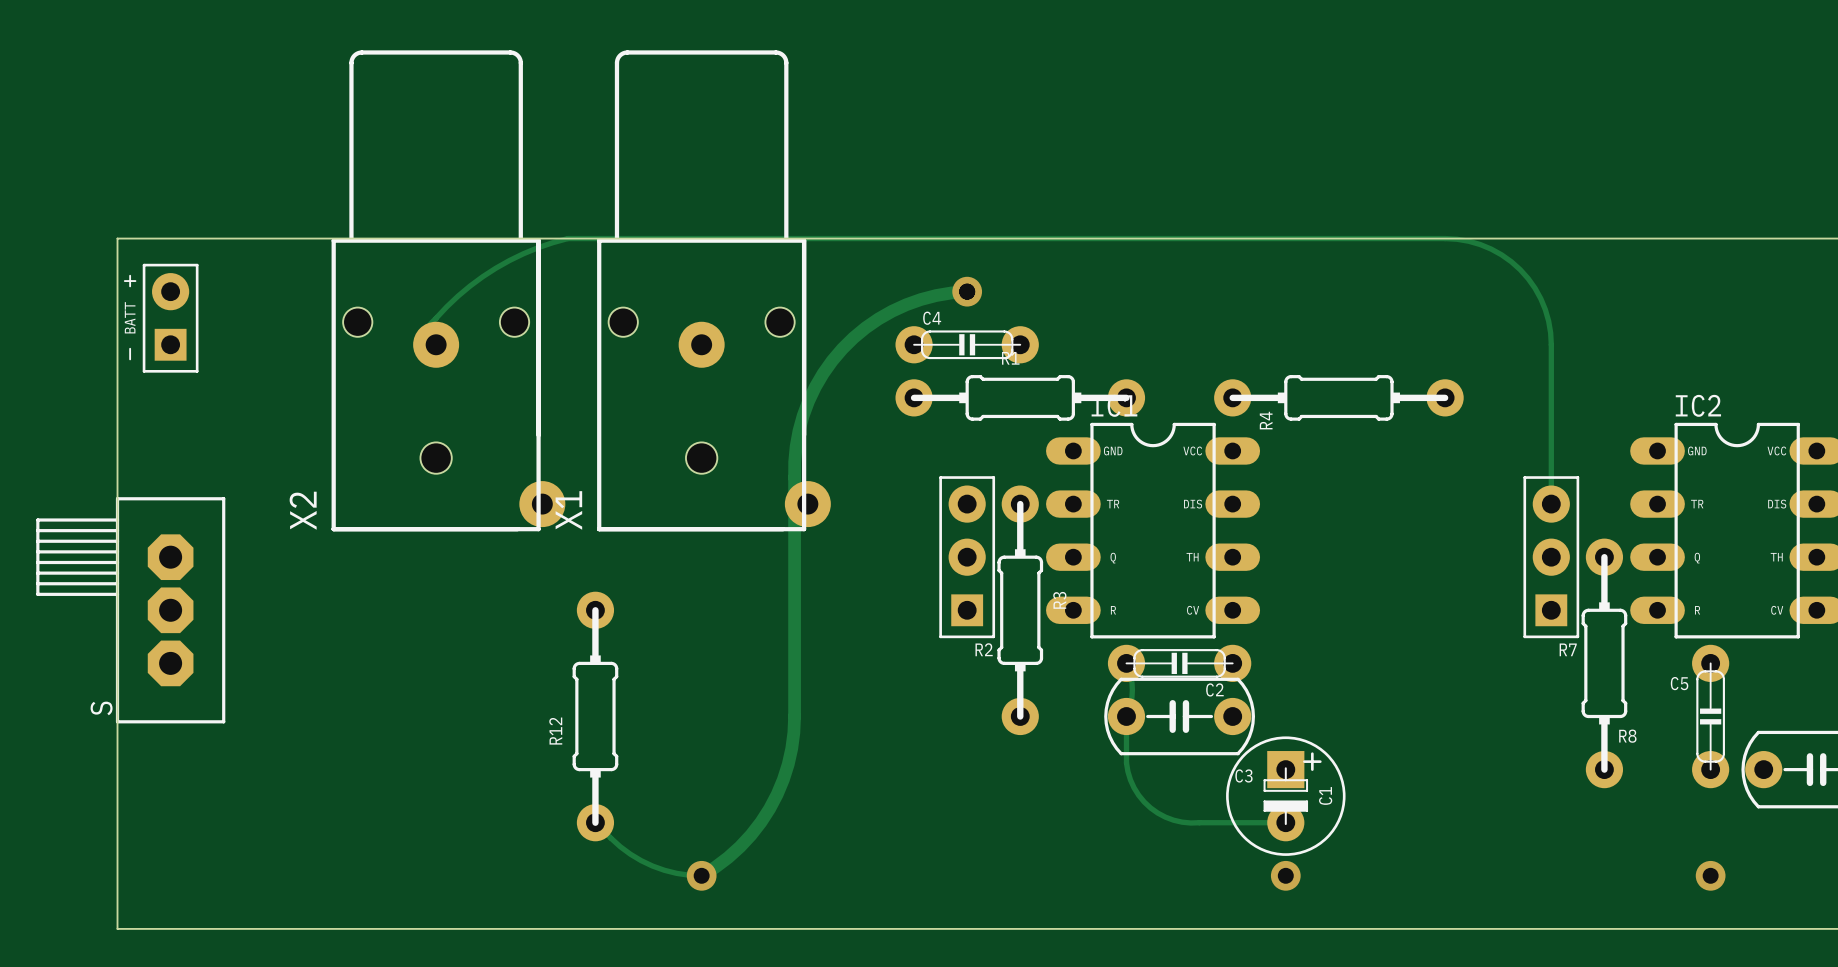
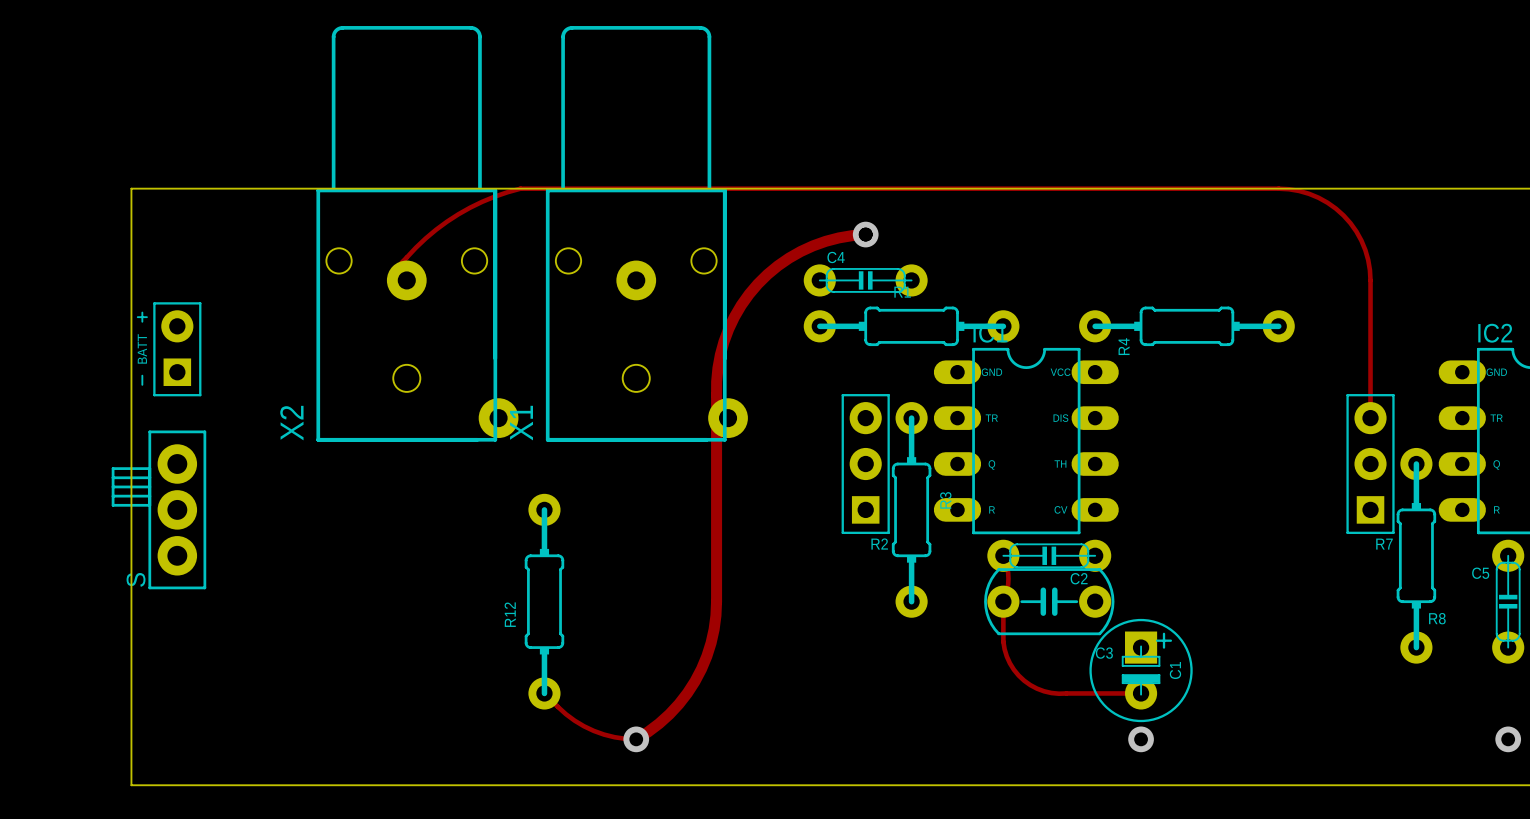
BATT position: (161, 318) -> (169, 349)
S footprint: [36, 497, 226, 724] -> [111, 430, 207, 590]

